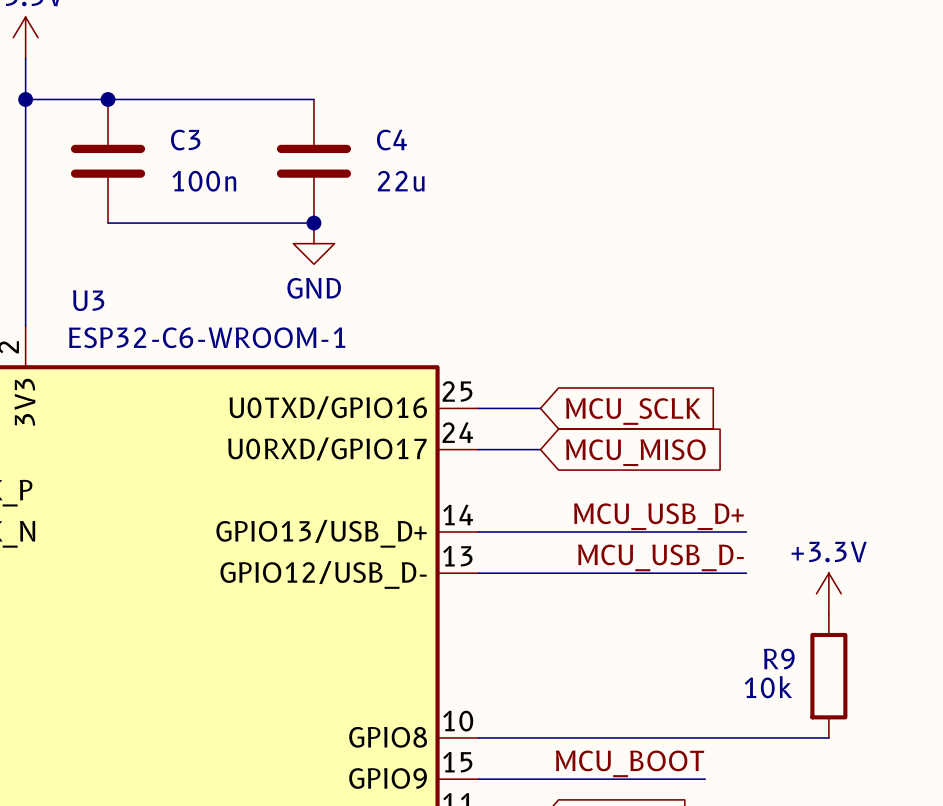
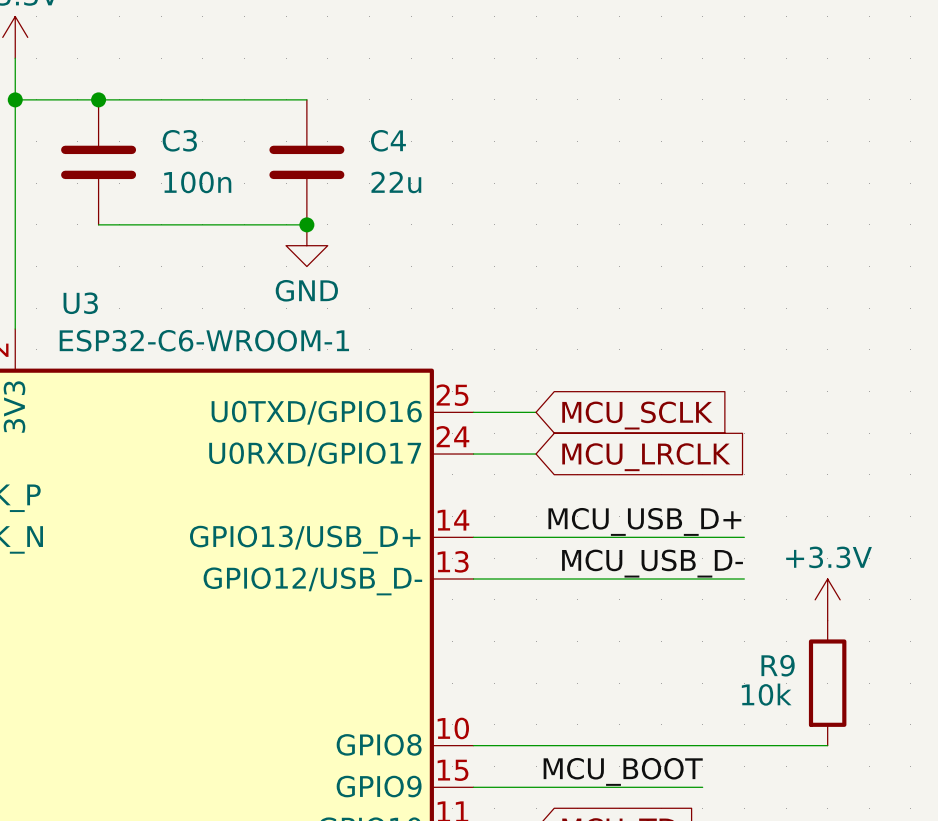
global label: MCU_MISO (635, 452) -> MCU_LRCLK (646, 457)

